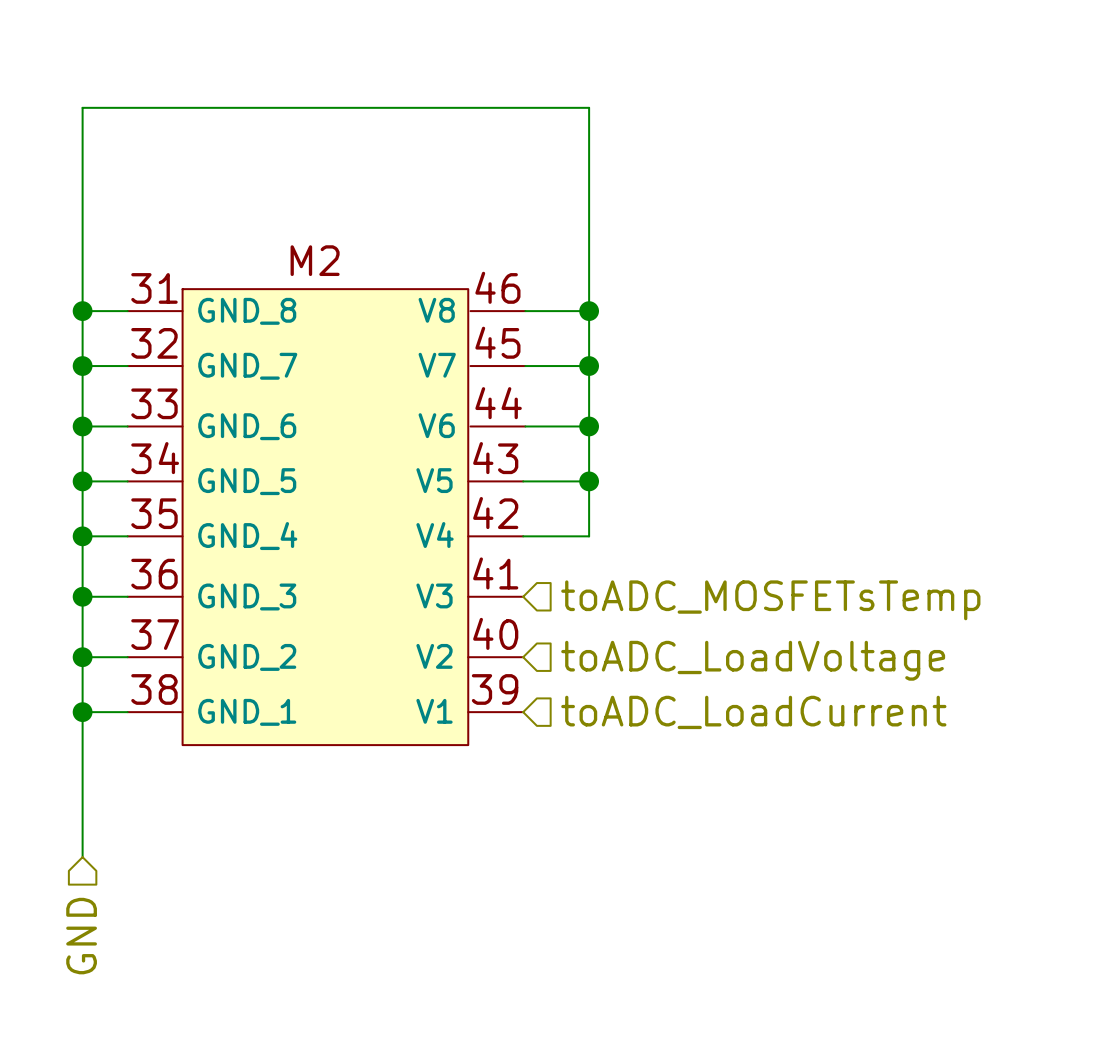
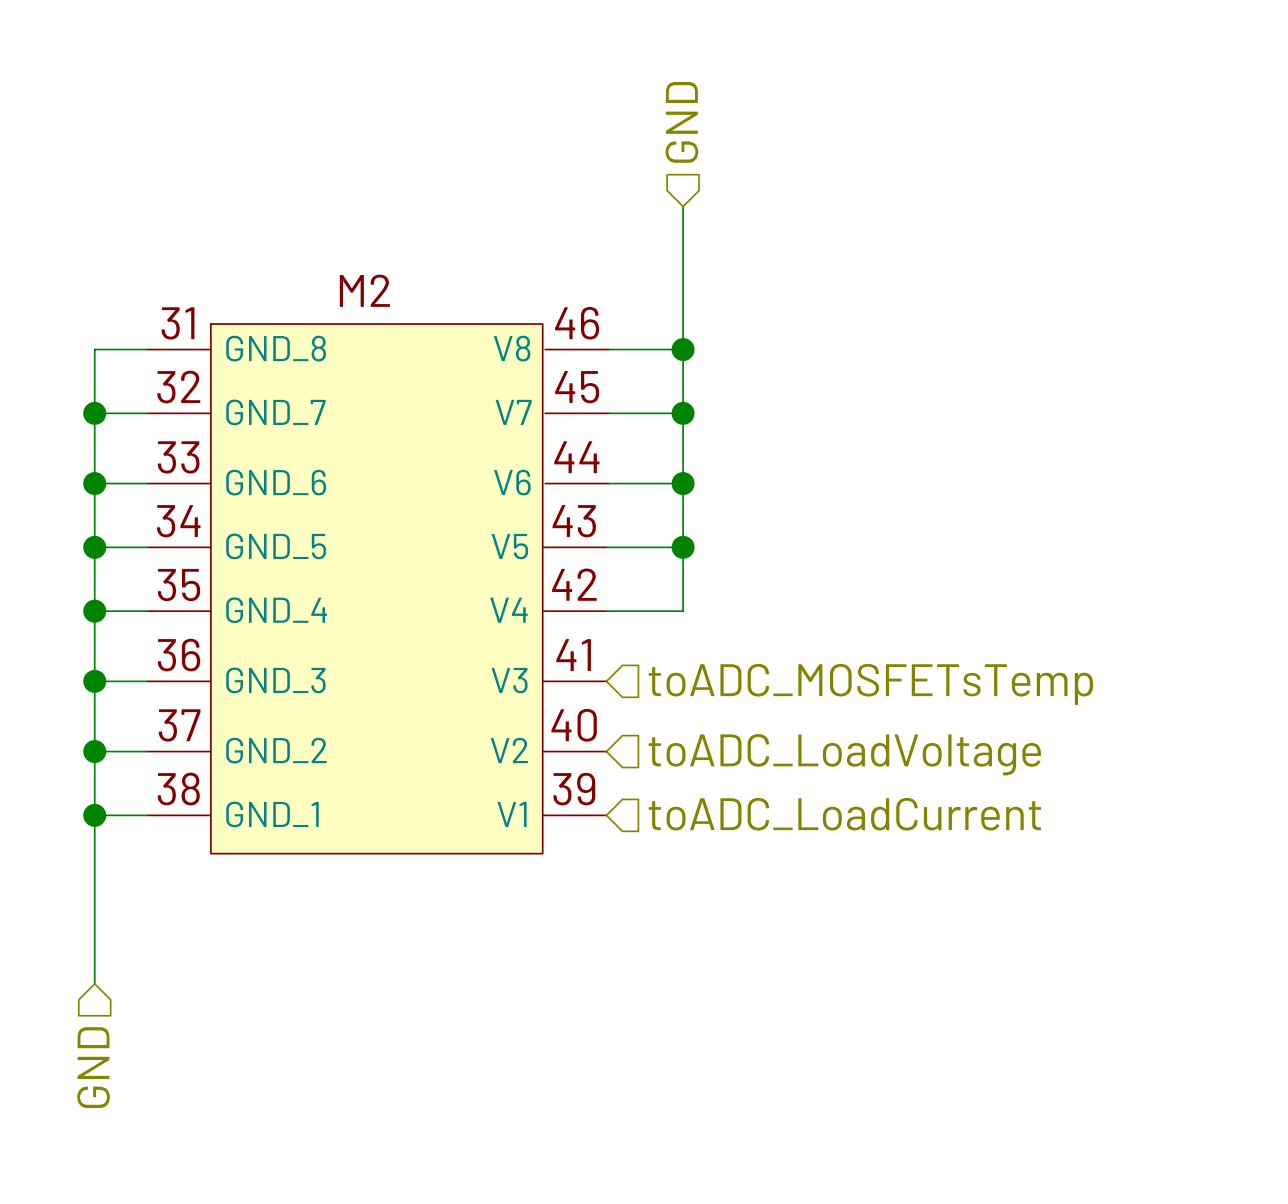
hierarchical label: none -> GND (681, 122)
wire: (589, 188) (589, 107) (82, 107) (82, 311) -> none
junction: (82, 311) -> none

